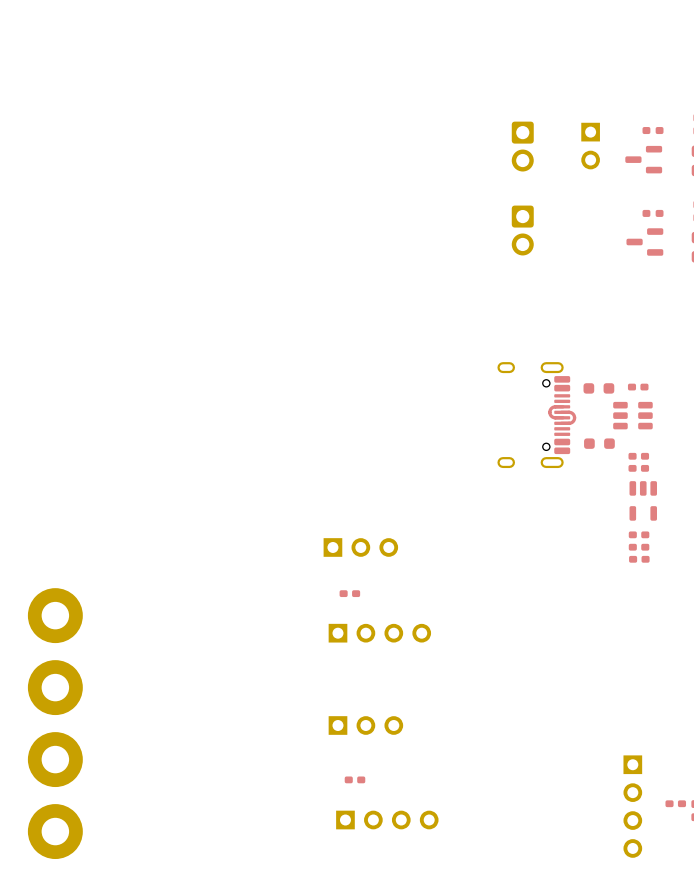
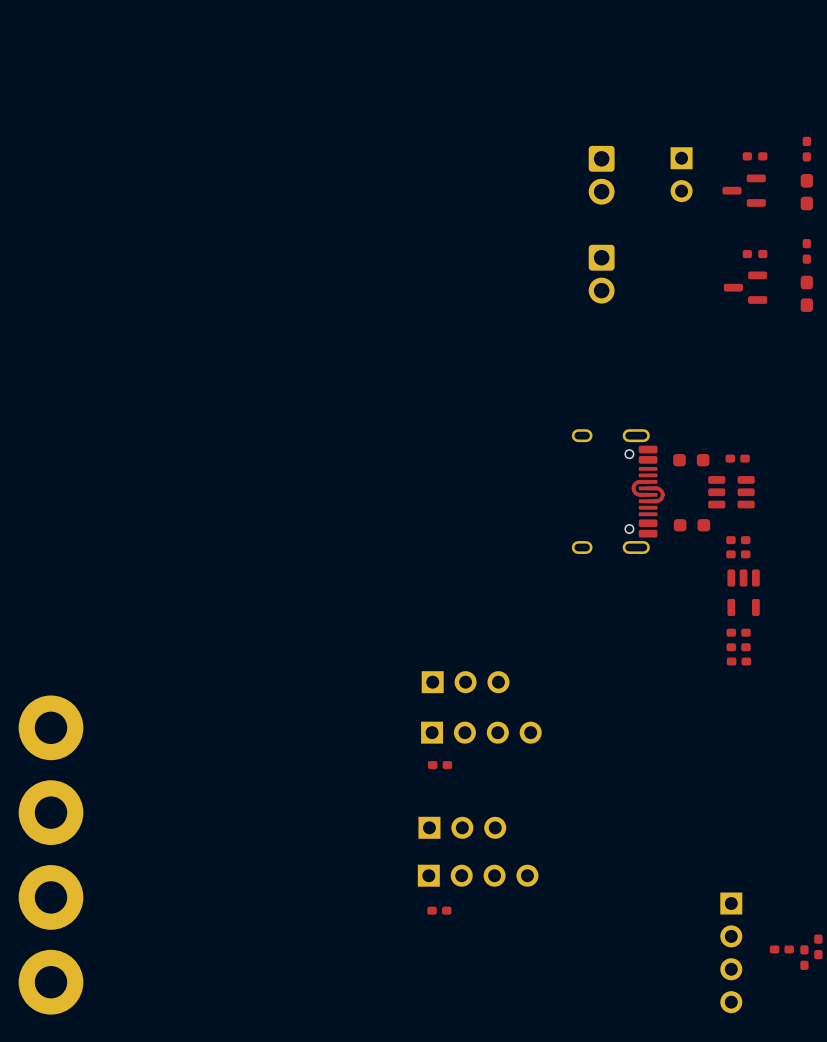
part position: (360, 547) -> (465, 682)
part position: (349, 593) -> (440, 765)
part position: (379, 633) -> (481, 732)
part position: (365, 725) -> (462, 827)
part: none -> (478, 875)
part position: (354, 779) -> (439, 910)
part: (387, 820) -> none

